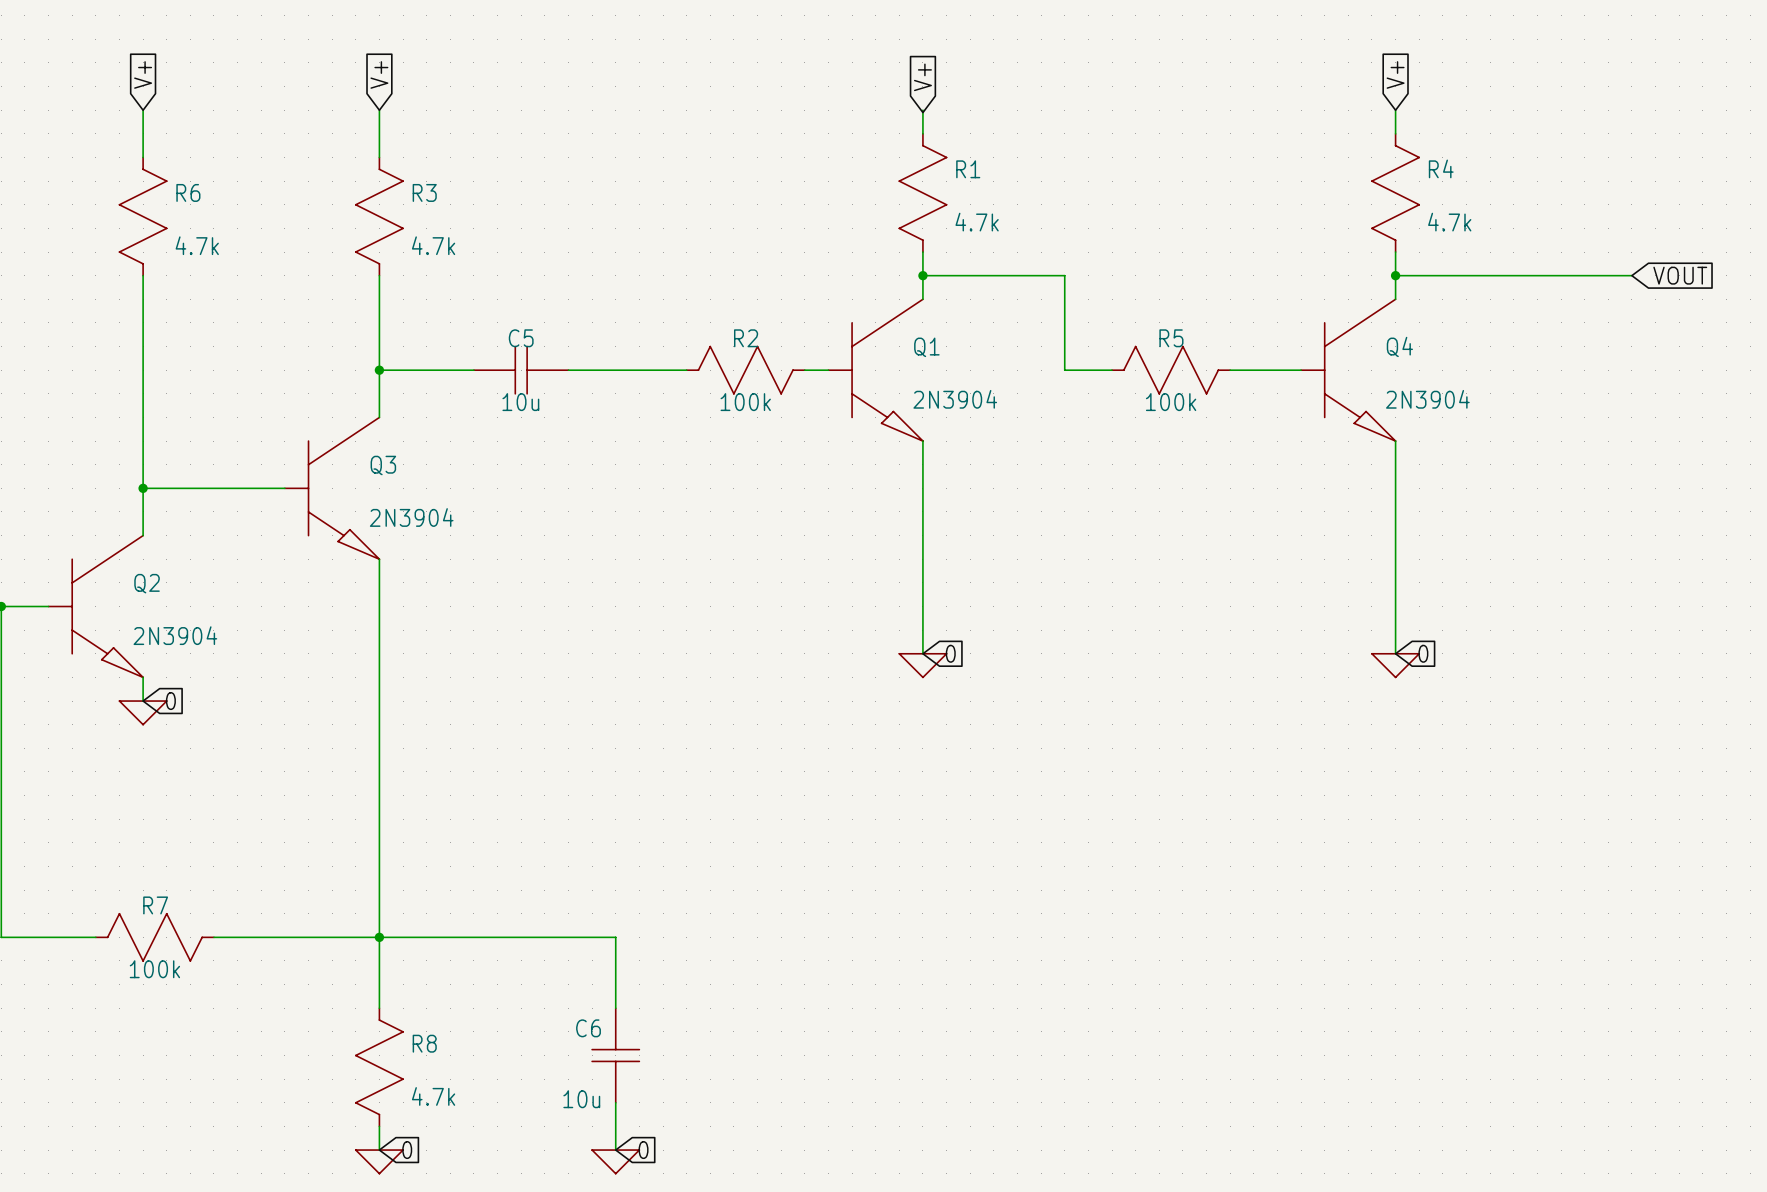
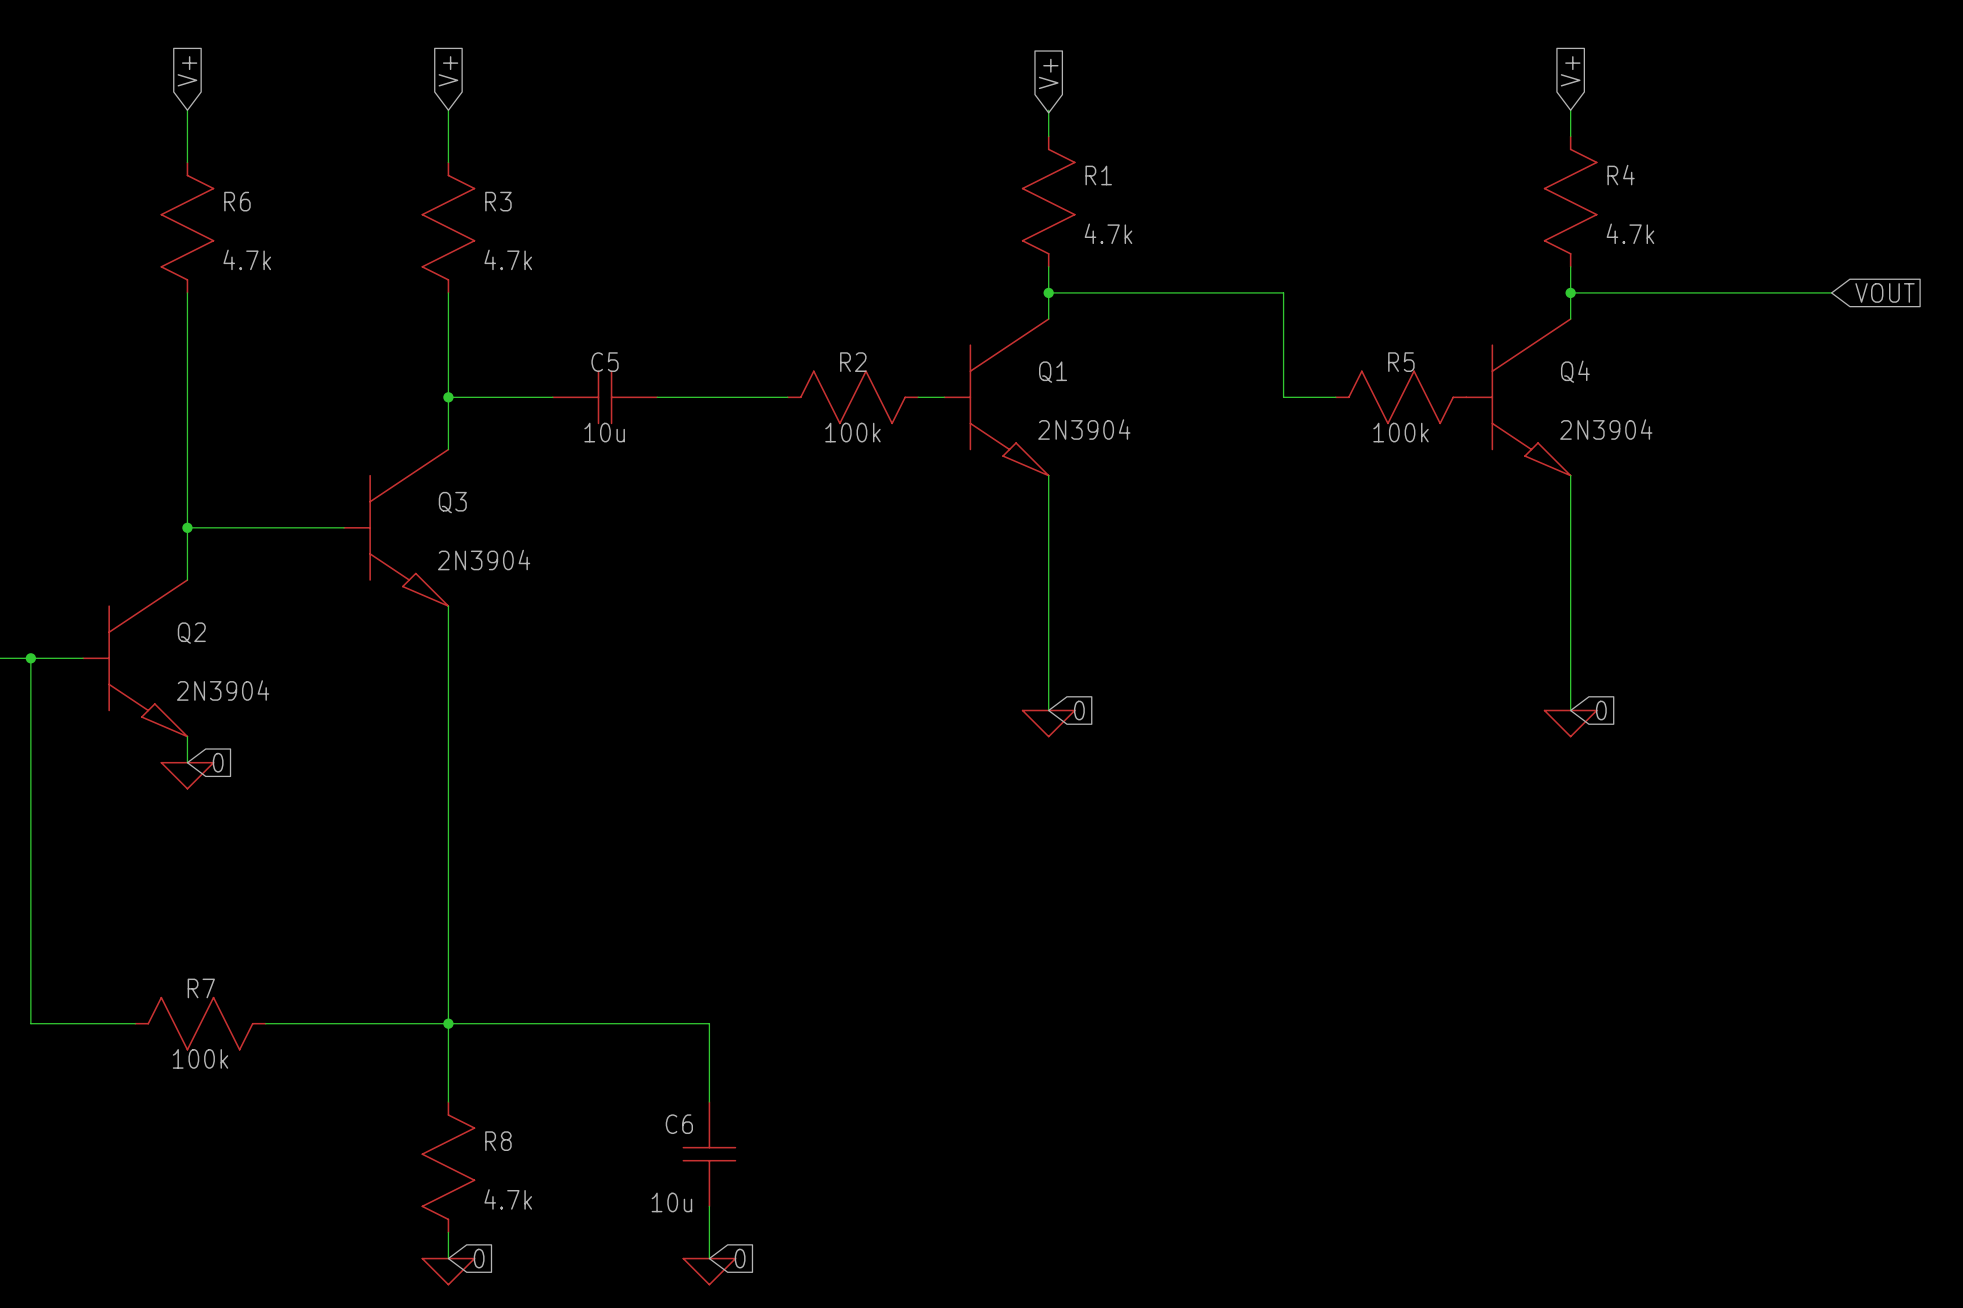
wire: (1064, 275) (1064, 370) (1112, 370) -> (1205, 292) (1283, 292) (1283, 397) (1335, 397)
R5 position: (1171, 370) -> (1401, 397)
wire: (1230, 370) (1301, 370) -> none

